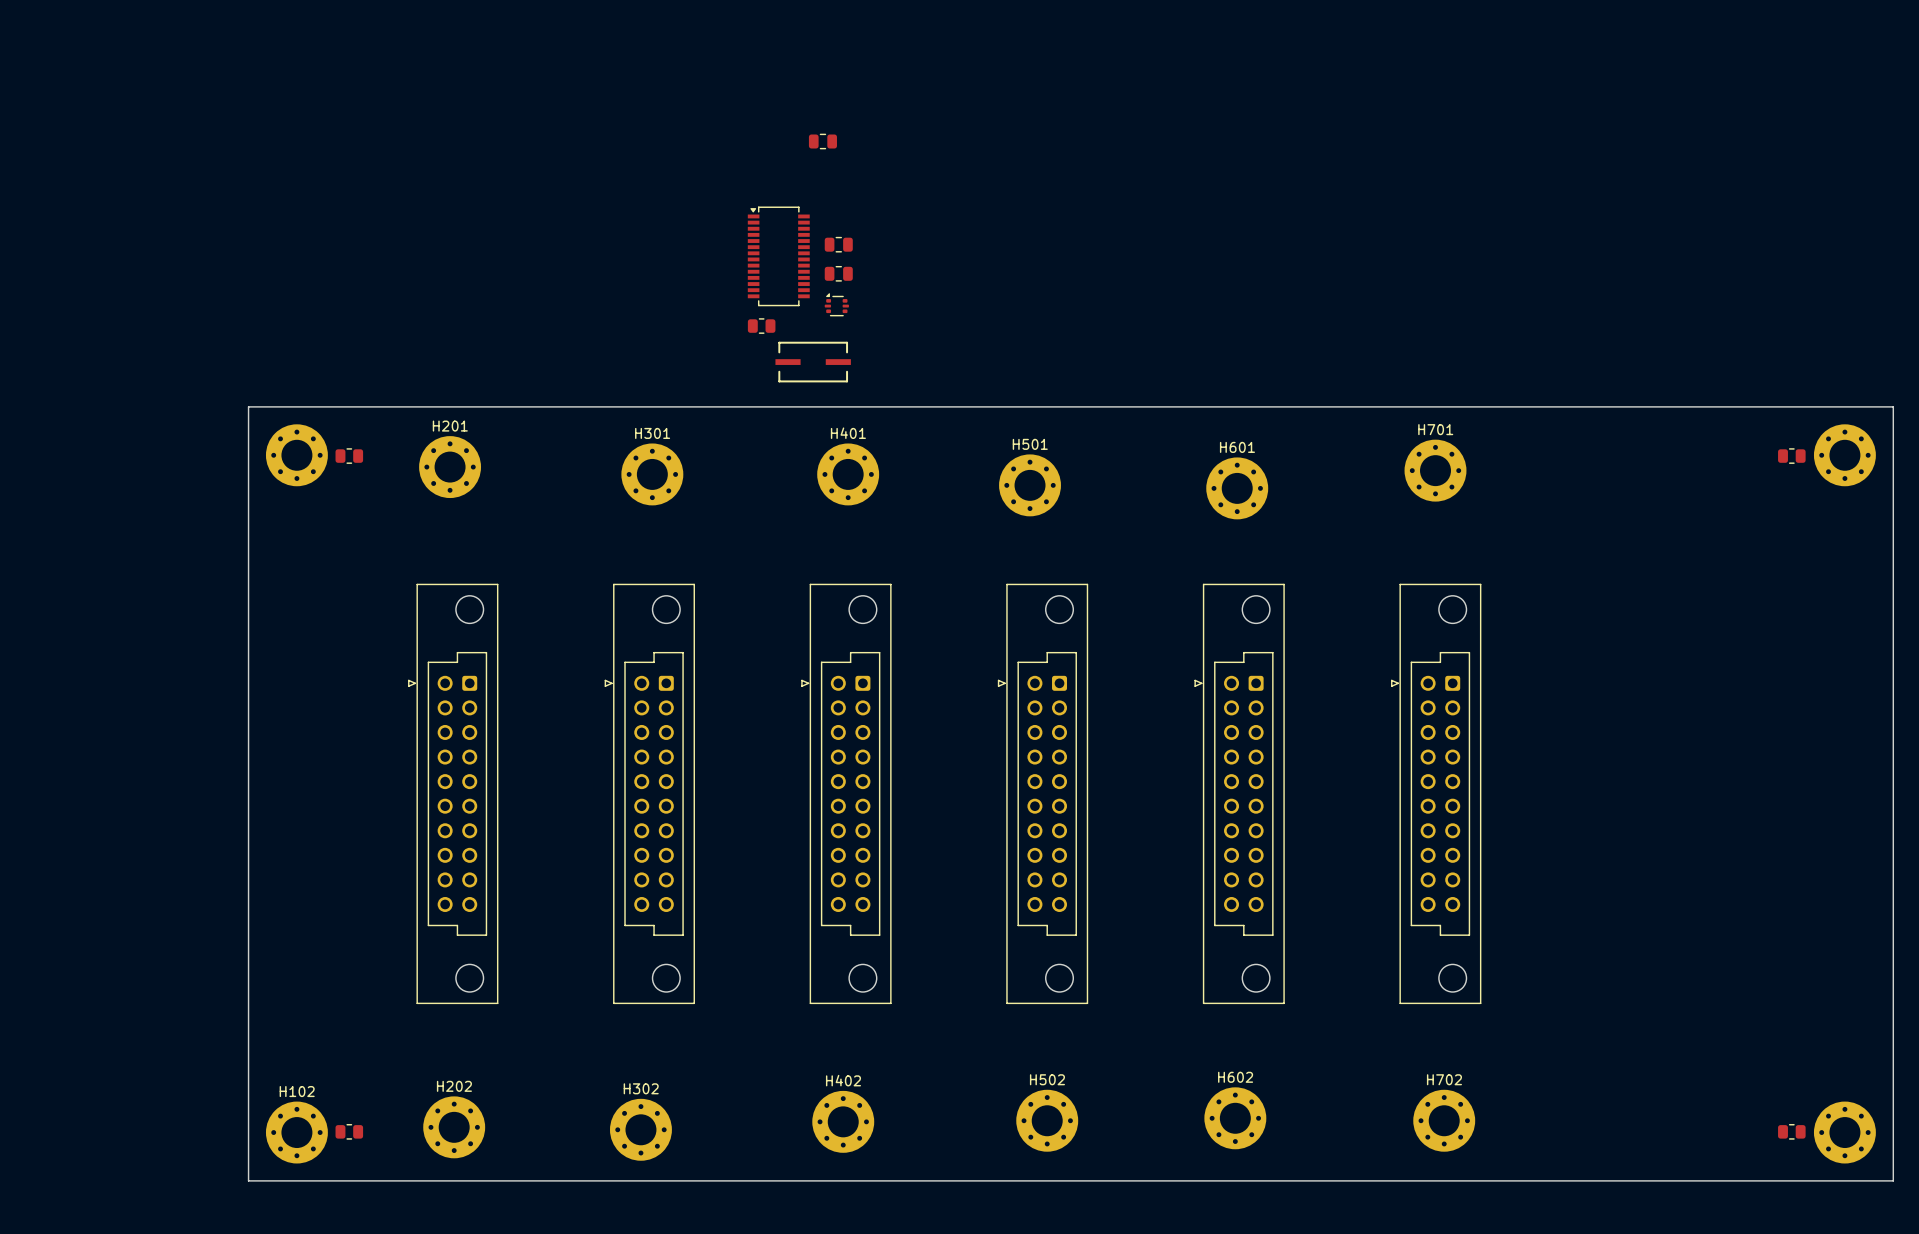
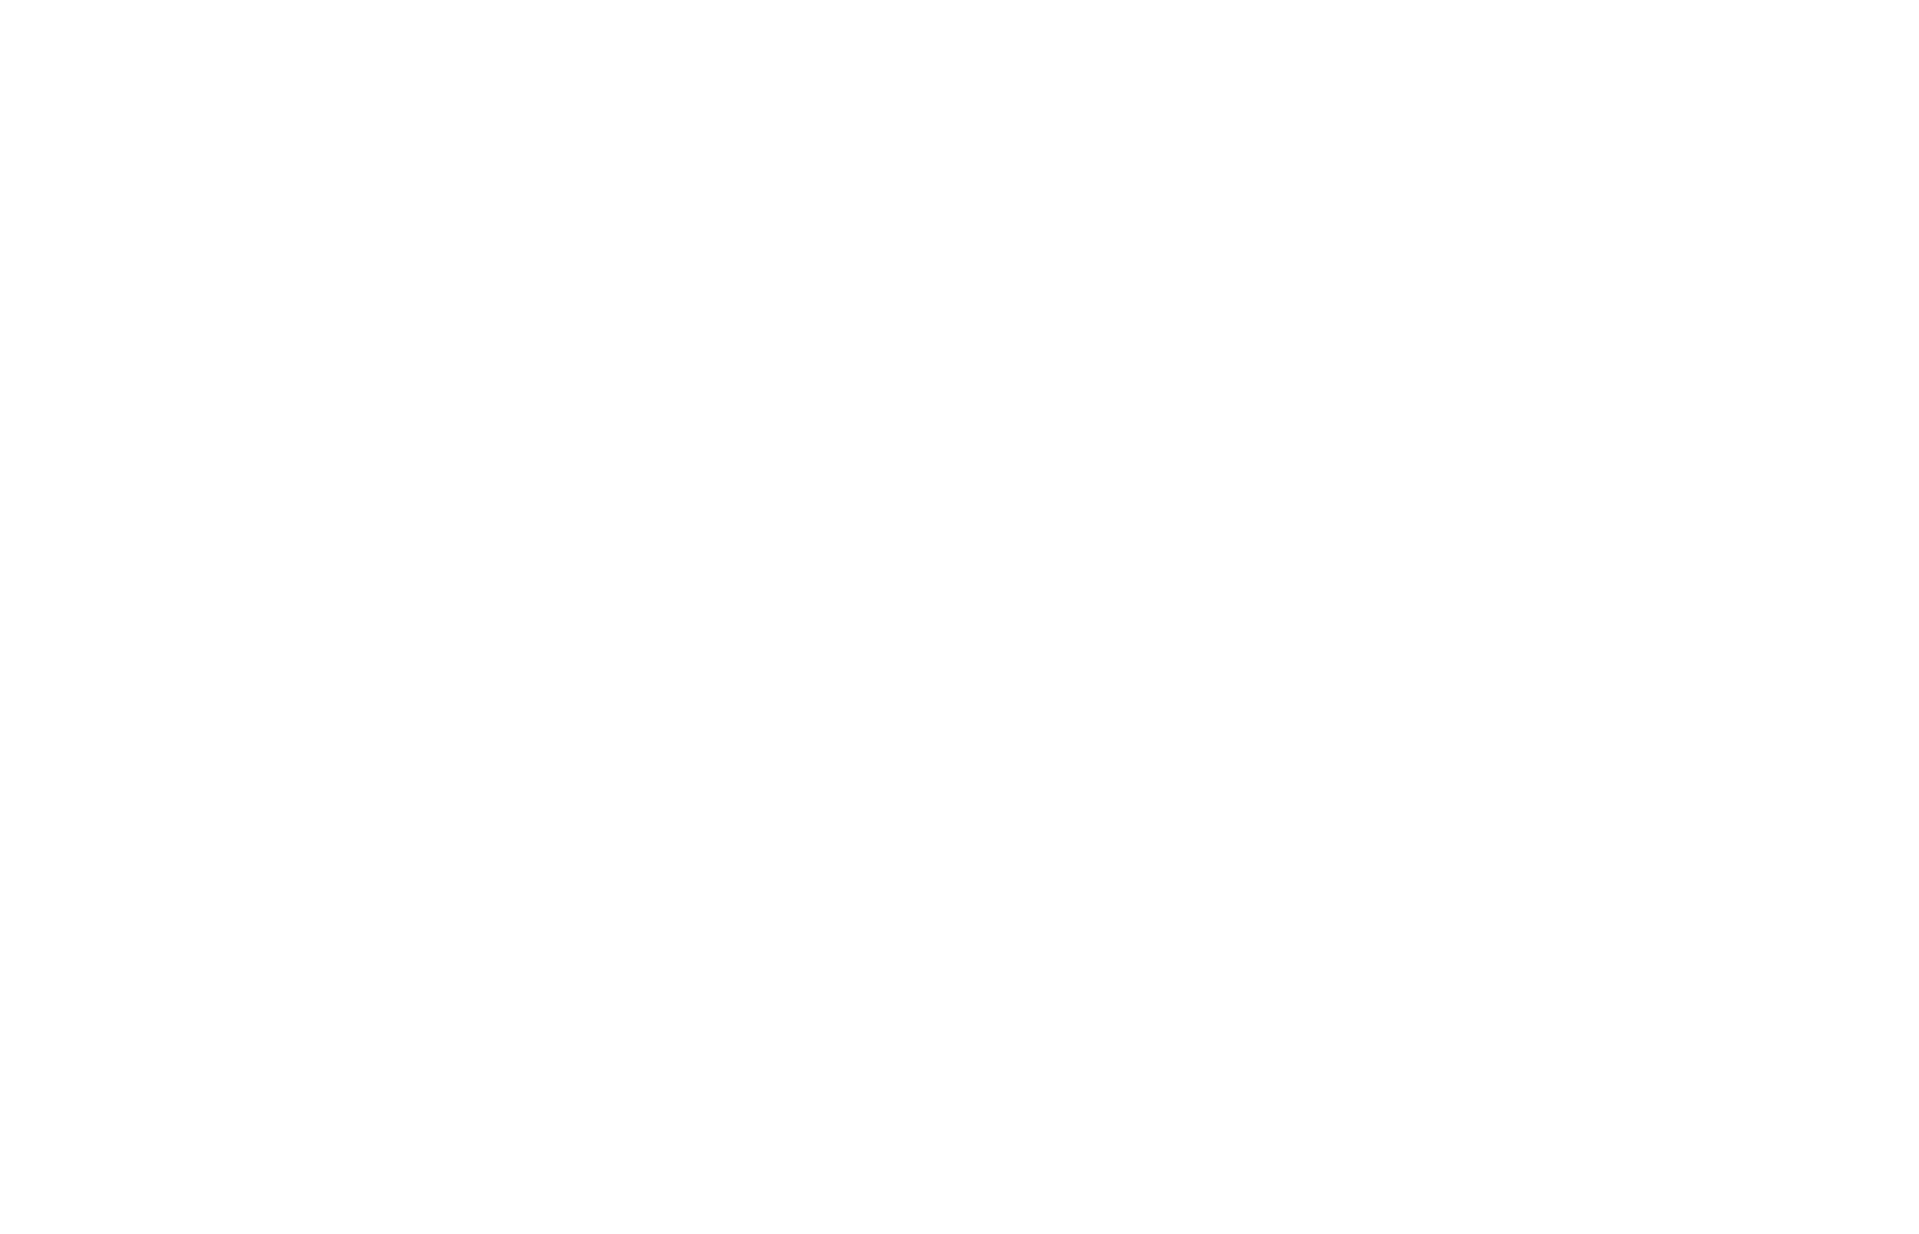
part: (822, 141) -> none
part: (838, 244) -> none
part: (778, 256) -> none
part: (838, 273) -> none
part: (836, 304) -> none
part: (761, 326) -> none
part: (813, 362) -> none
board edge: (248, 406) (1893, 406) (1893, 1180) (248, 1180) (248, 406) -> none
part: (296, 455) -> none
part: (1844, 455) -> none
part: (349, 456) -> none
part: (1791, 456) -> none
H201: (450, 467) -> none
H701: (1435, 470) -> none
H301: (652, 474) -> none
H401: (848, 474) -> none
H501: (1030, 485) -> none
H601: (1237, 488) -> none
part: (453, 793) -> none
part: (649, 793) -> none
part: (846, 793) -> none
part: (1043, 793) -> none
part: (1239, 793) -> none
part: (1436, 793) -> none
H602: (1235, 1118) -> none
H502: (1047, 1120) -> none
H702: (1444, 1120) -> none
H402: (843, 1121) -> none
H202: (454, 1127) -> none
H302: (640, 1129) -> none
part: (349, 1131) -> none
part: (1791, 1131) -> none
H102: (296, 1132) -> none
part: (1844, 1132) -> none

